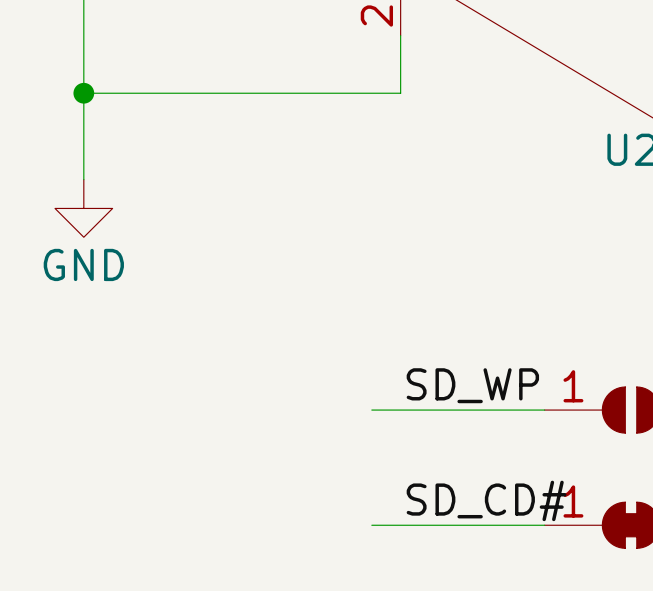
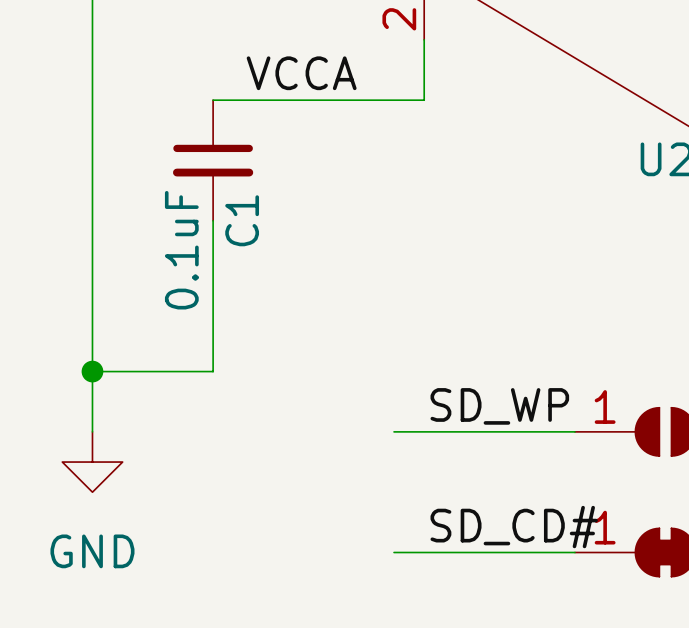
label: none -> VCCA (301, 73)
wire: (83, 93) (199, 93) -> none
junction: (83, 93) -> none
C1: none -> 0.1uF (213, 160)
wire: none -> (92, 190) (92, 431)
power symbol position: GND (83, 208) -> GND (92, 462)
wire: none -> (213, 220) (213, 371) (92, 371)
power symbol text position: GND (83, 264) -> GND (92, 551)
junction: none -> (92, 371)

